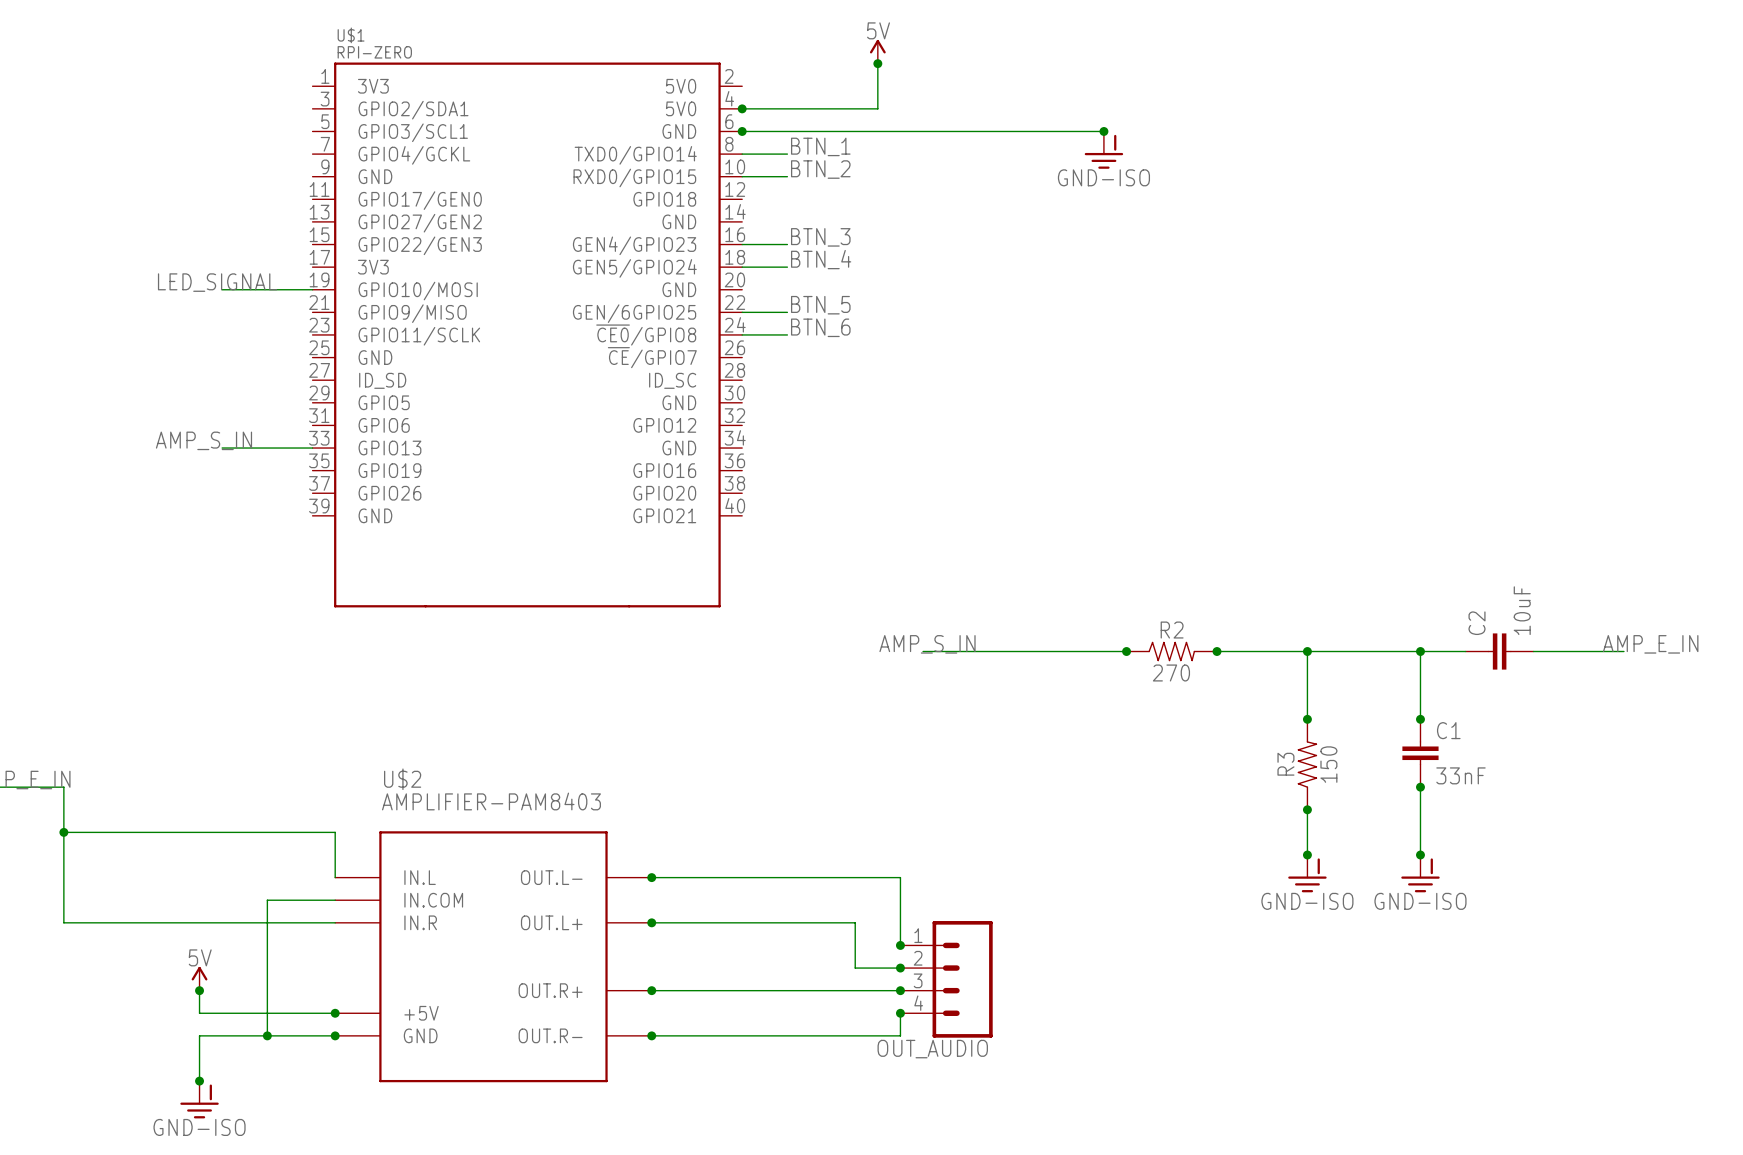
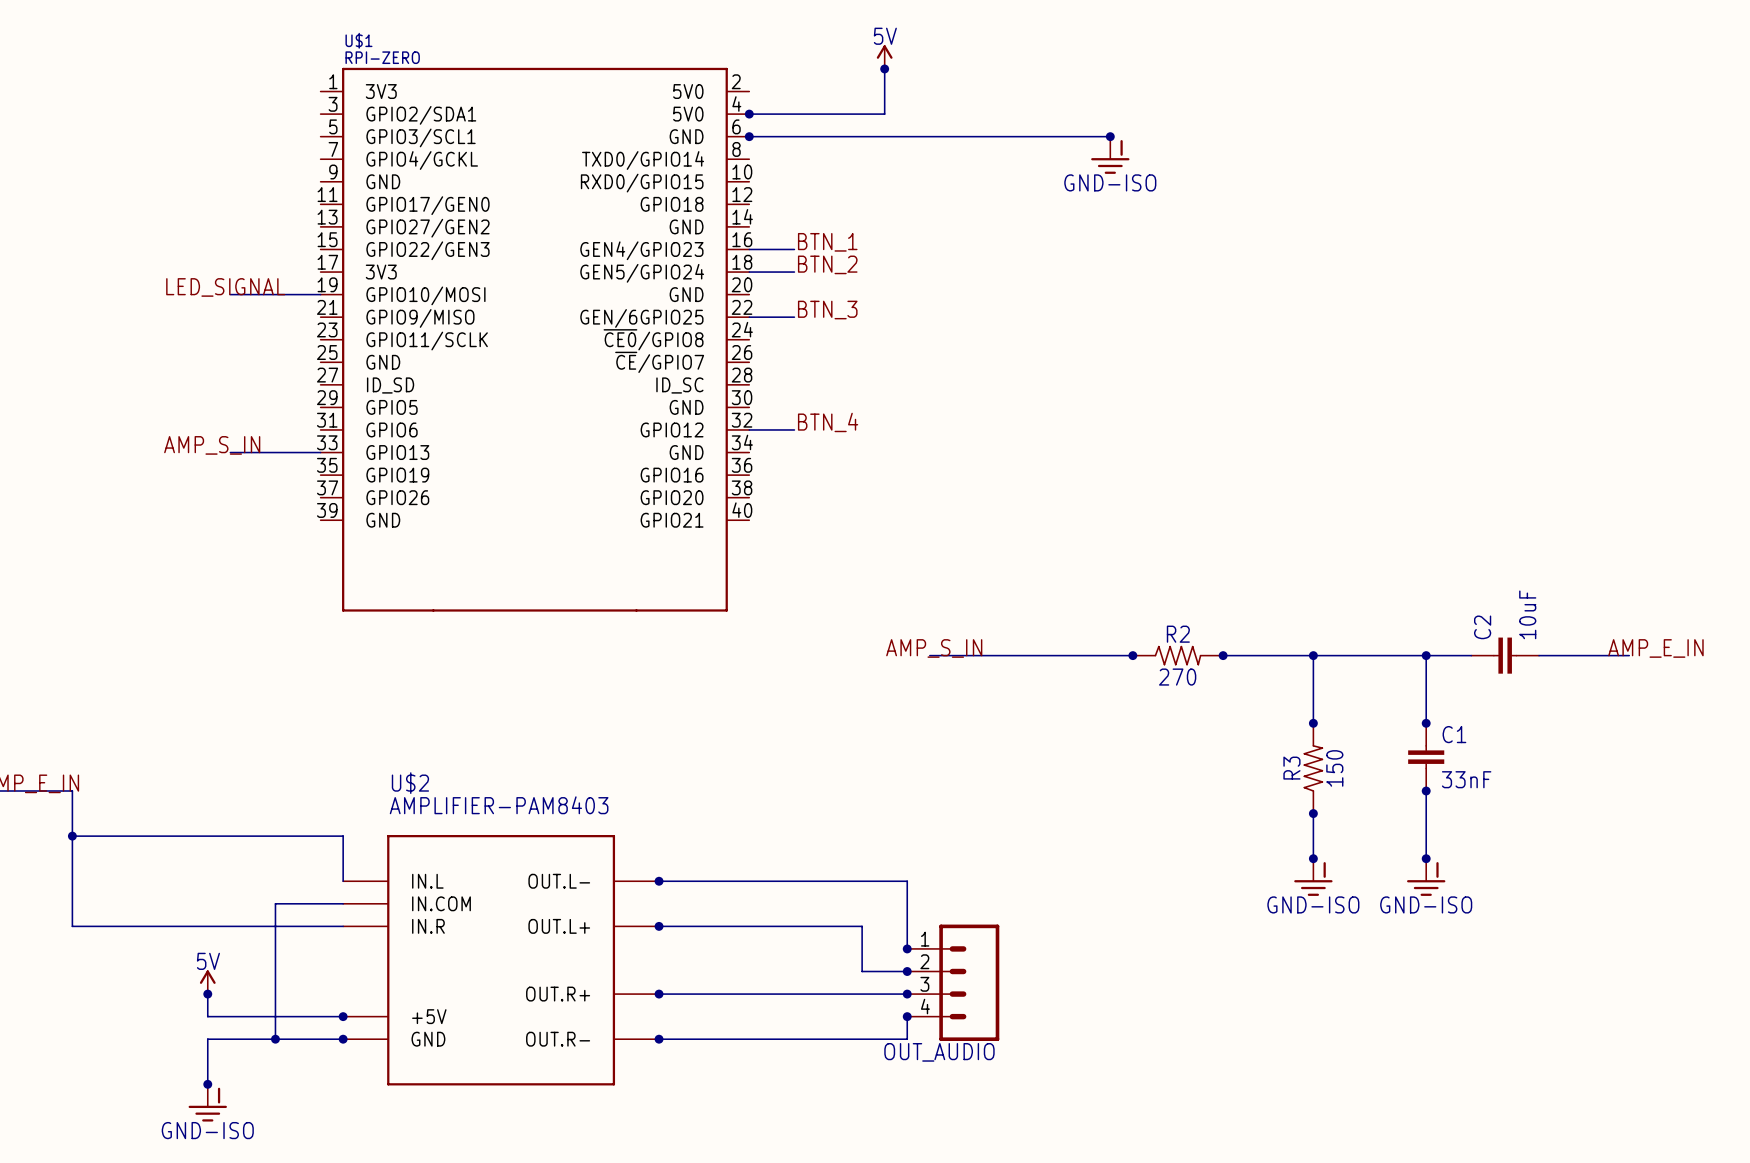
label: BTN_1 (820, 146) -> none
wire: (742, 154) (787, 154) -> none
label: BTN_2 (820, 169) -> none
wire: (742, 176) (787, 176) -> none
label: BTN_3 (820, 237) -> BTN_1 (827, 242)
label: BTN_4 (821, 259) -> BTN_2 (827, 264)
label: BTN_5 (820, 305) -> BTN_3 (827, 310)
label: BTN_6 (820, 327) -> none
wire: (742, 334) (787, 334) -> (749, 429) (794, 429)
label: none -> BTN_4 (828, 422)

